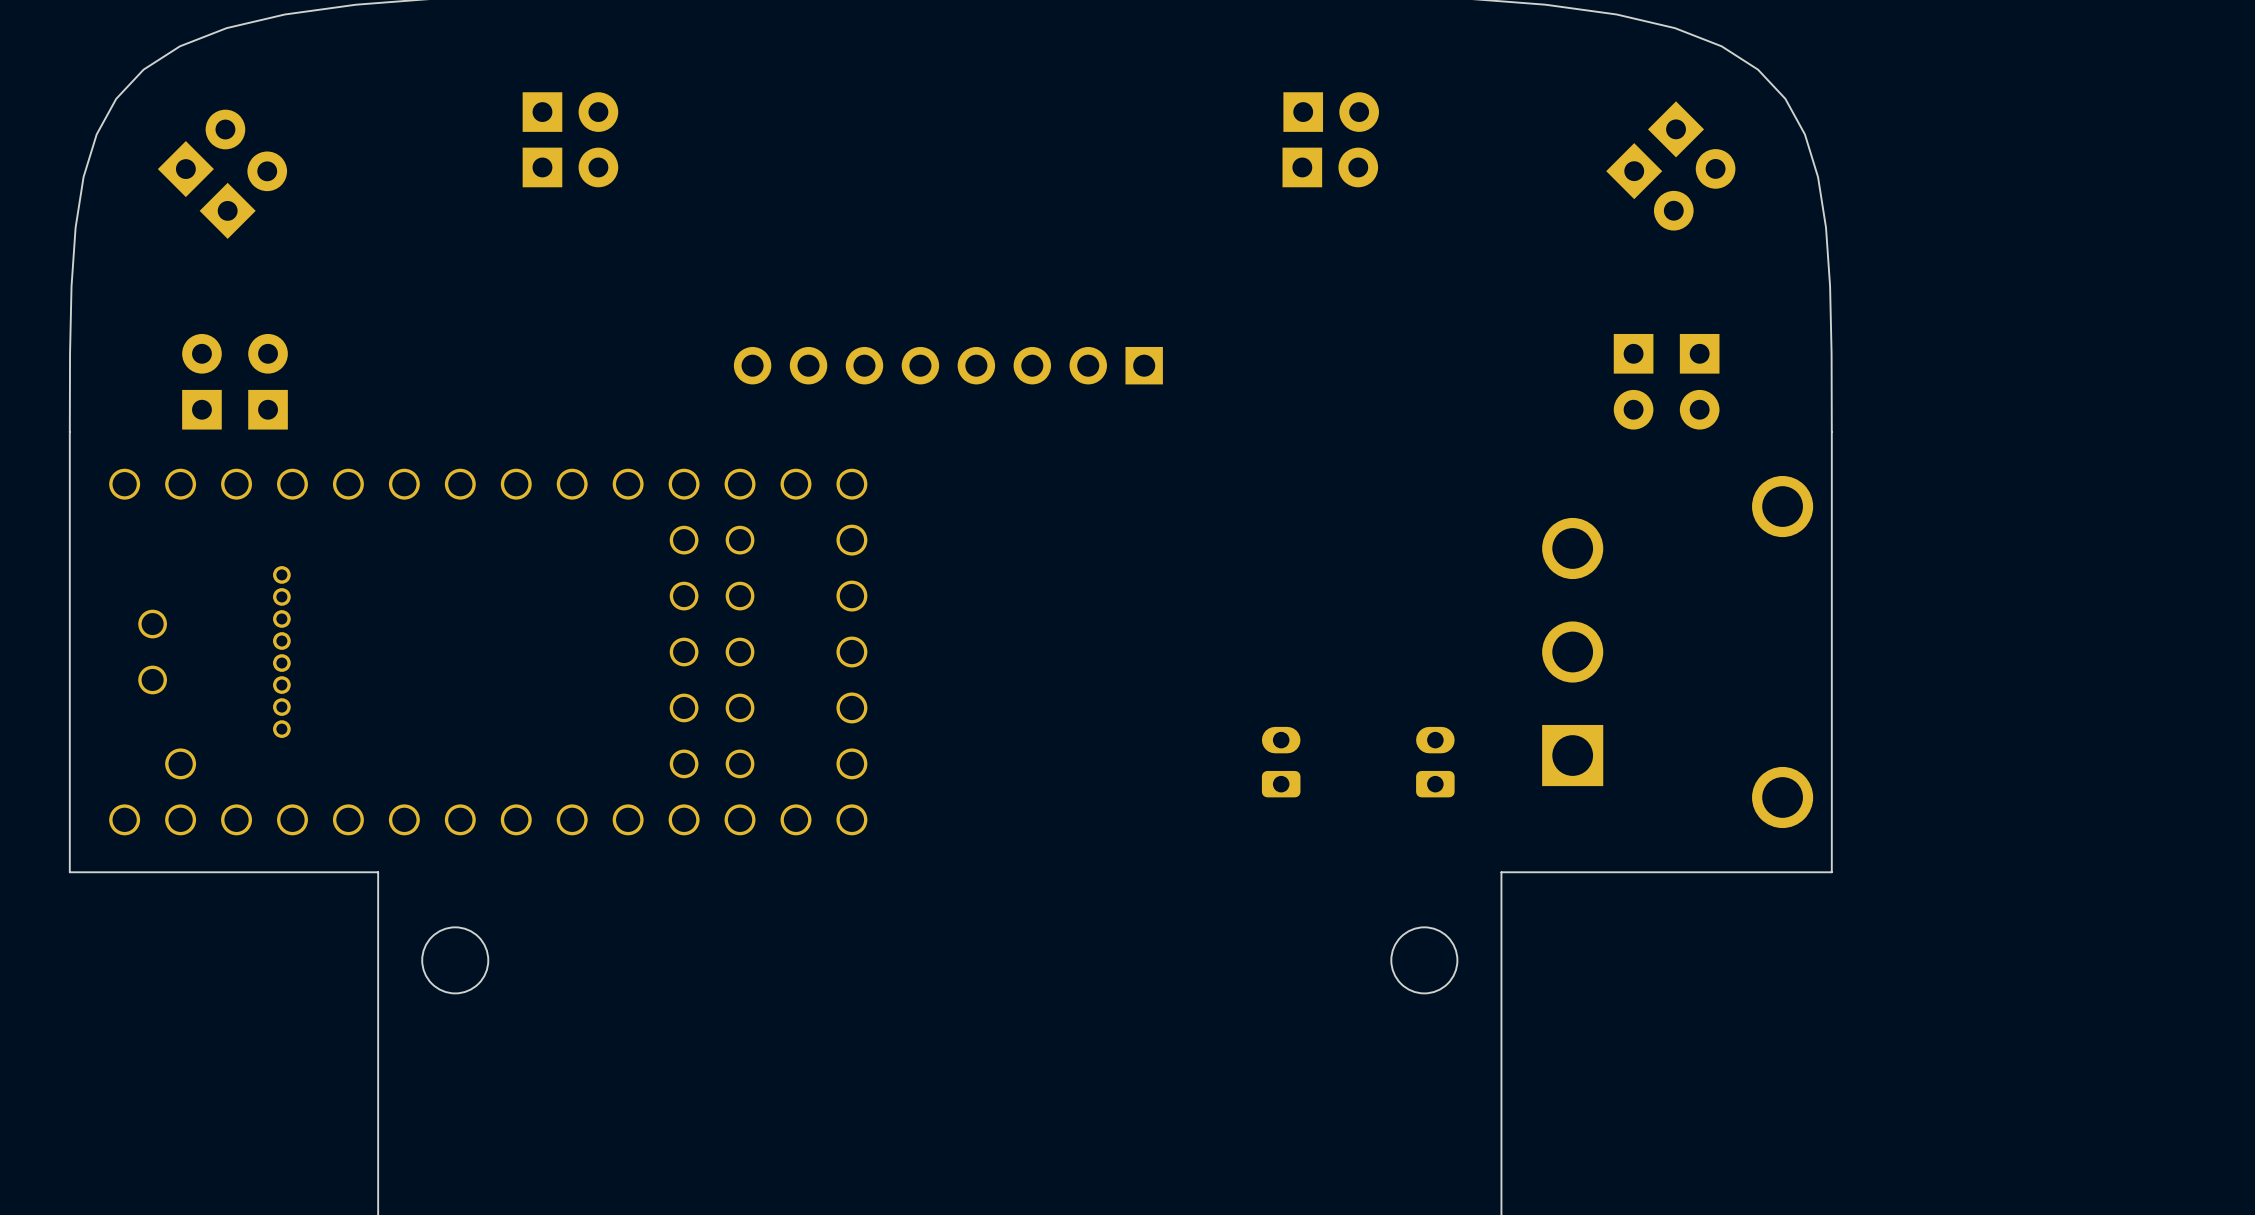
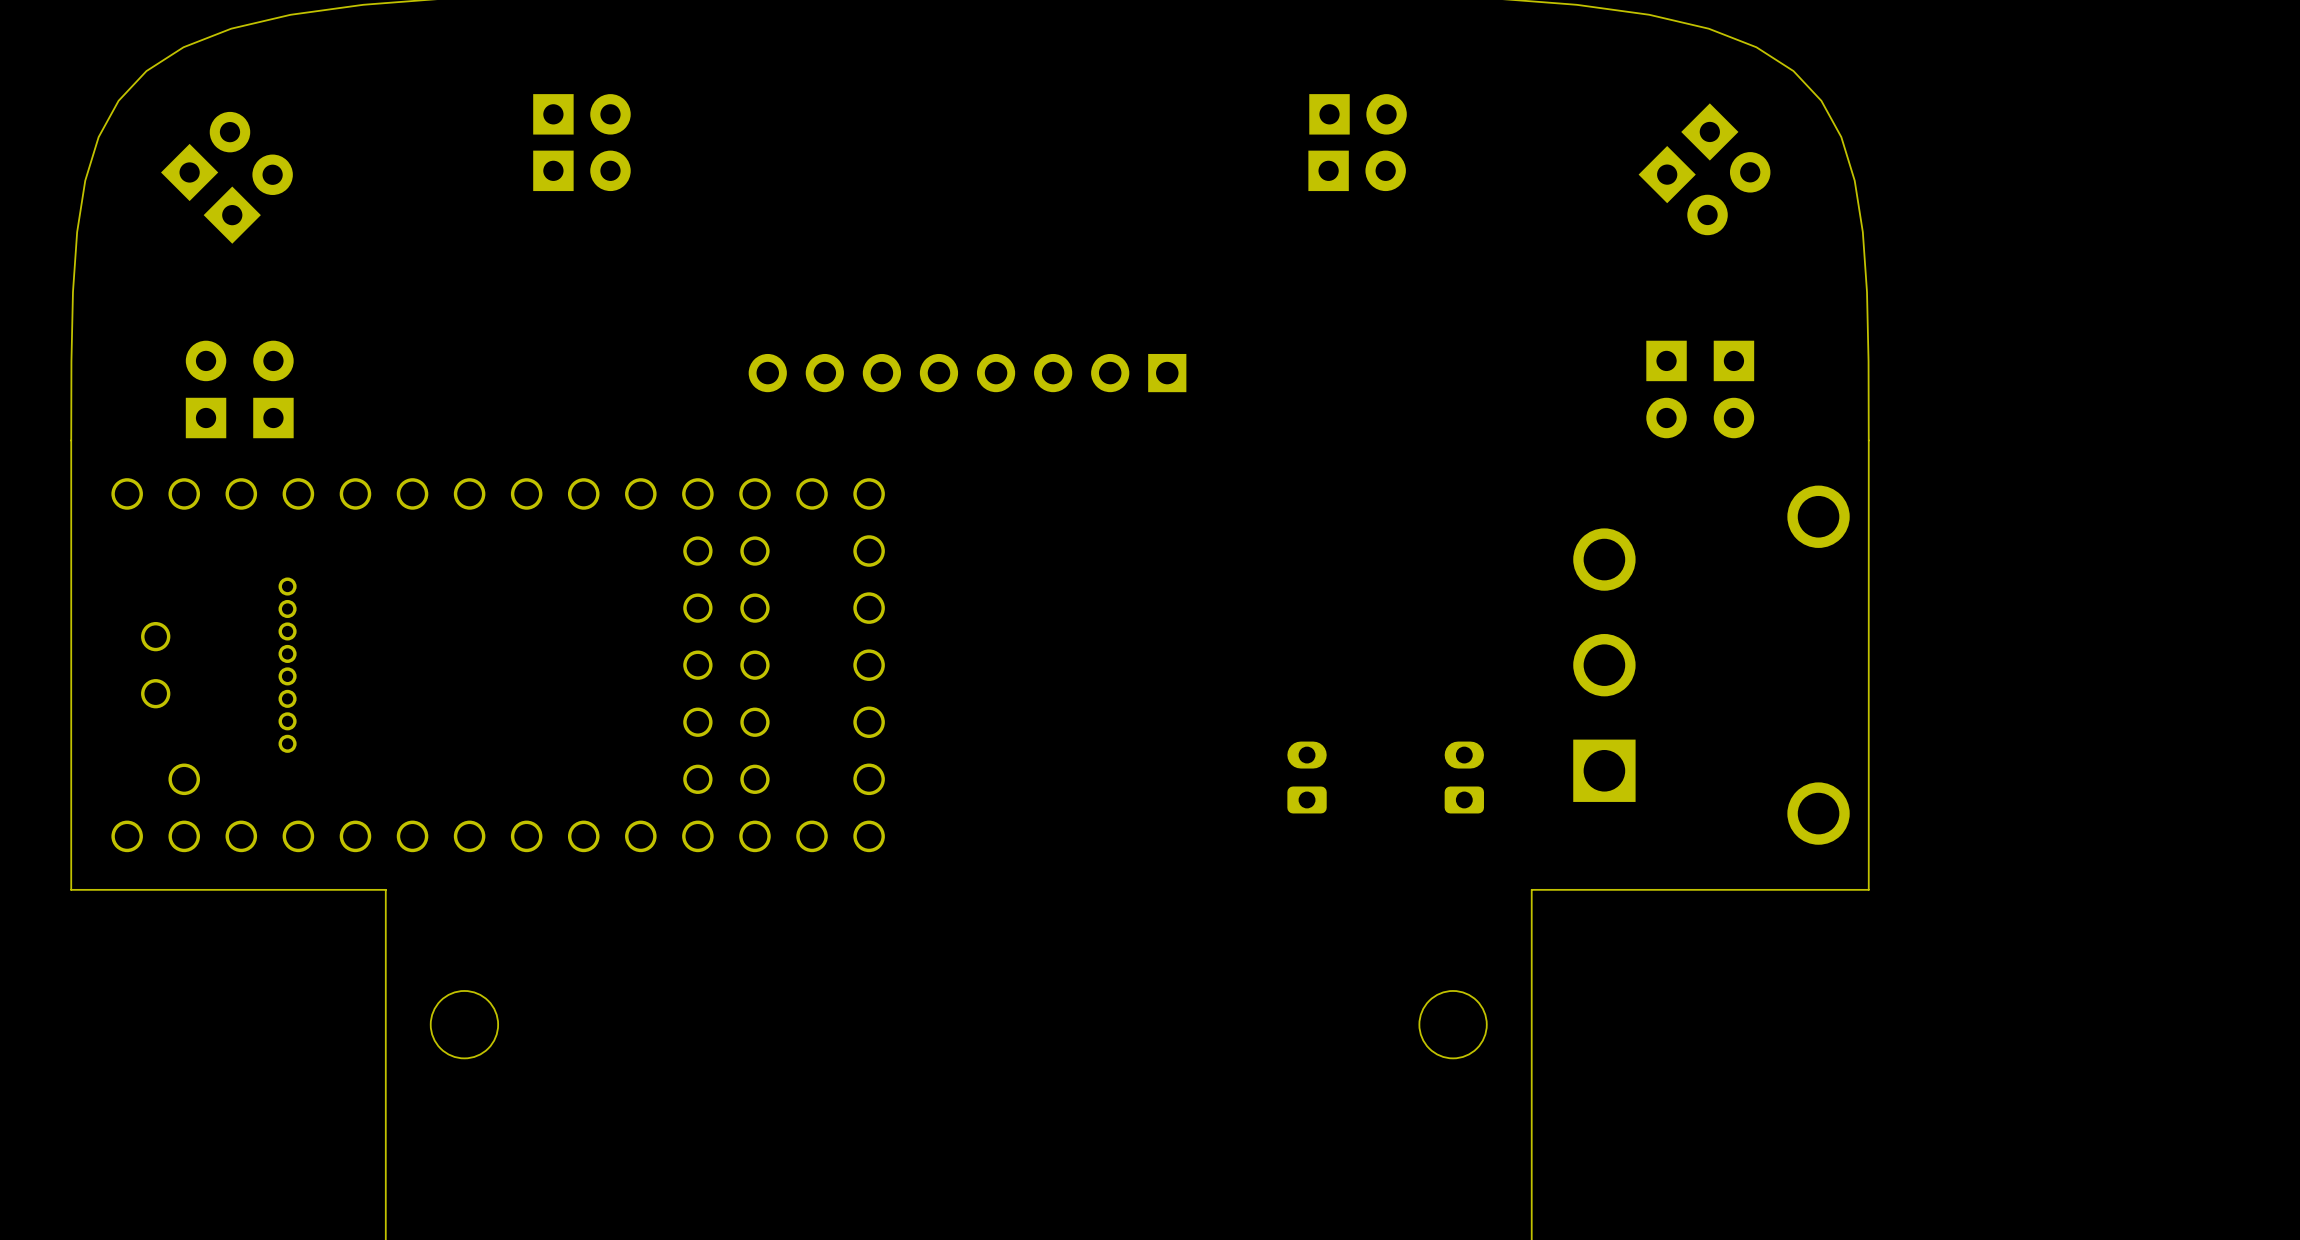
round board edge position: (455, 960) -> (464, 1024)
round board edge position: (1424, 960) -> (1453, 1024)

